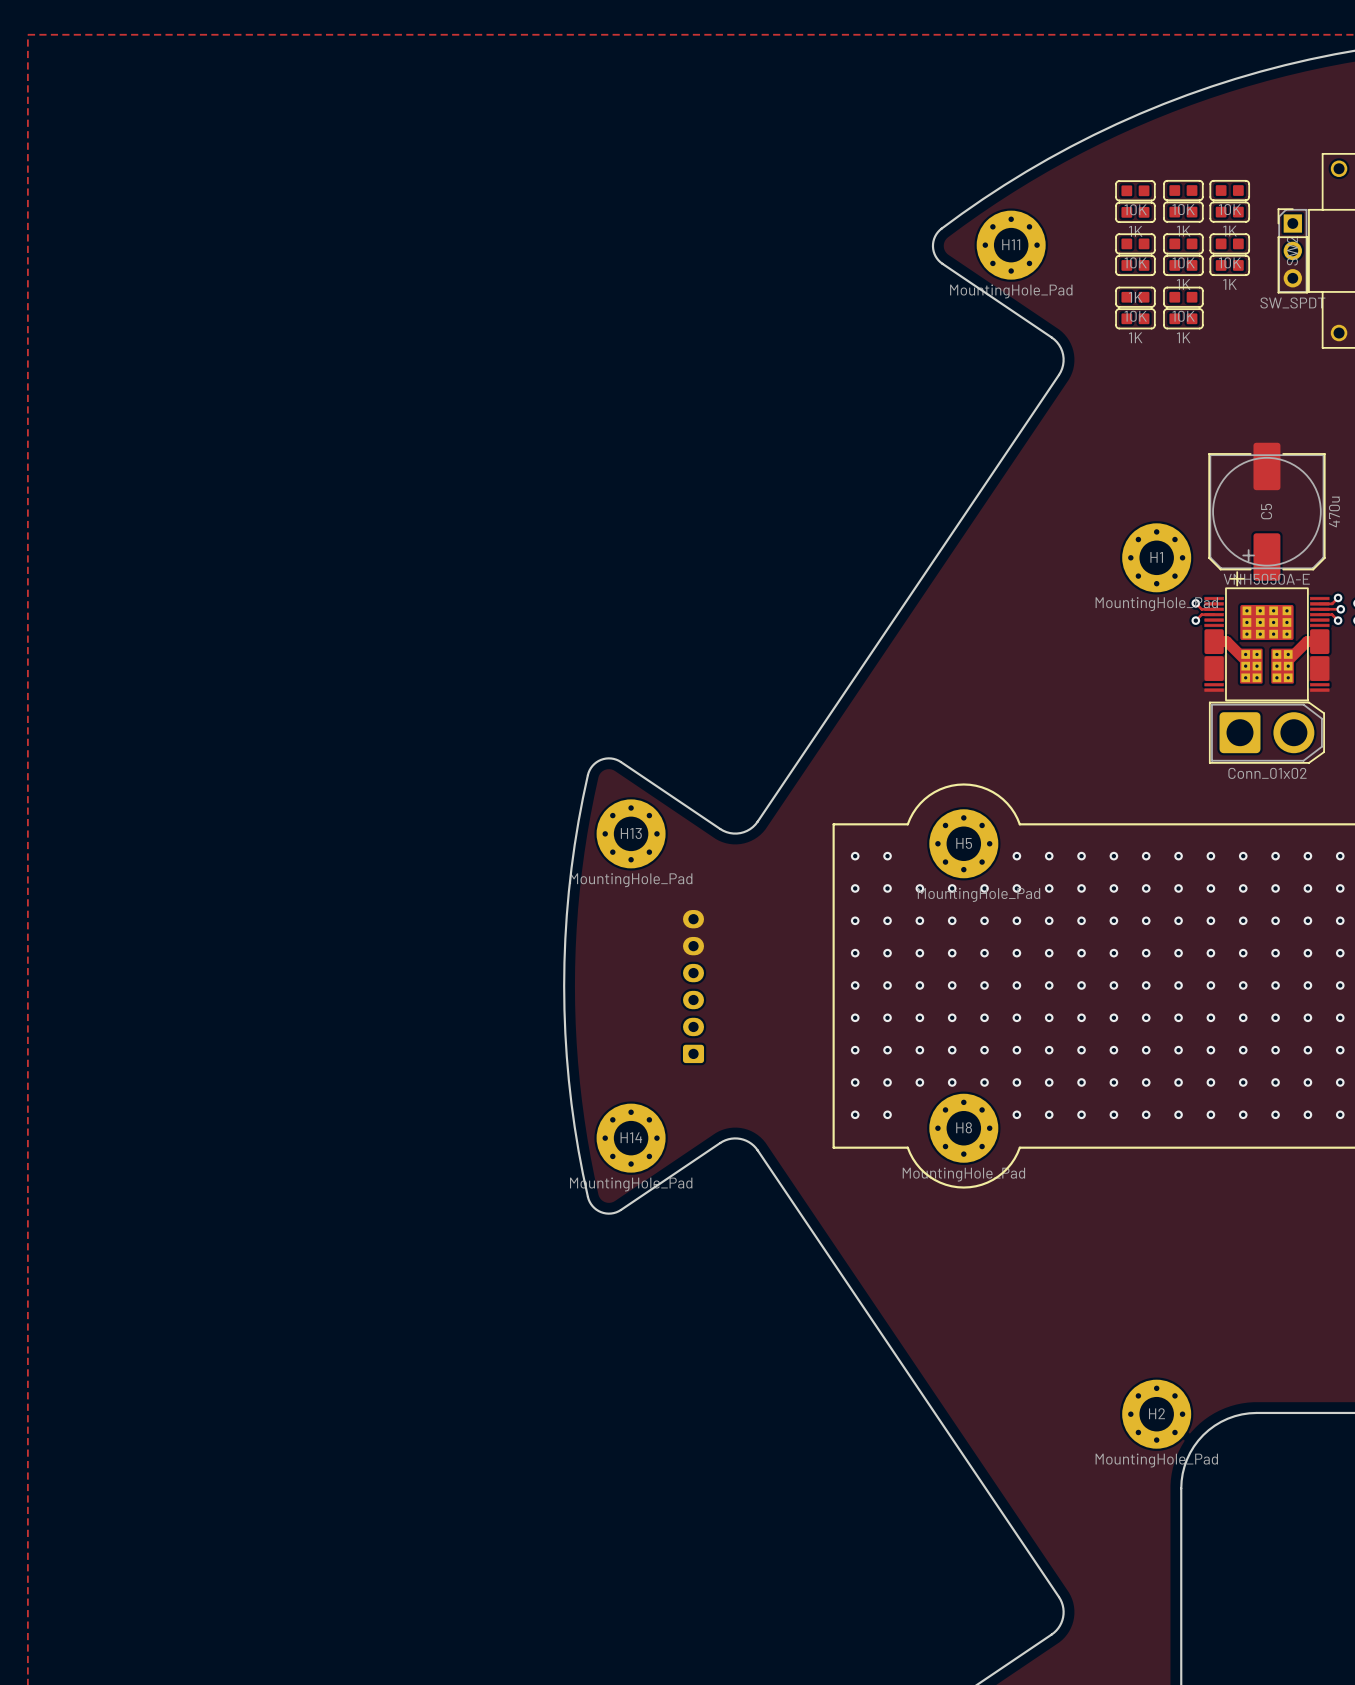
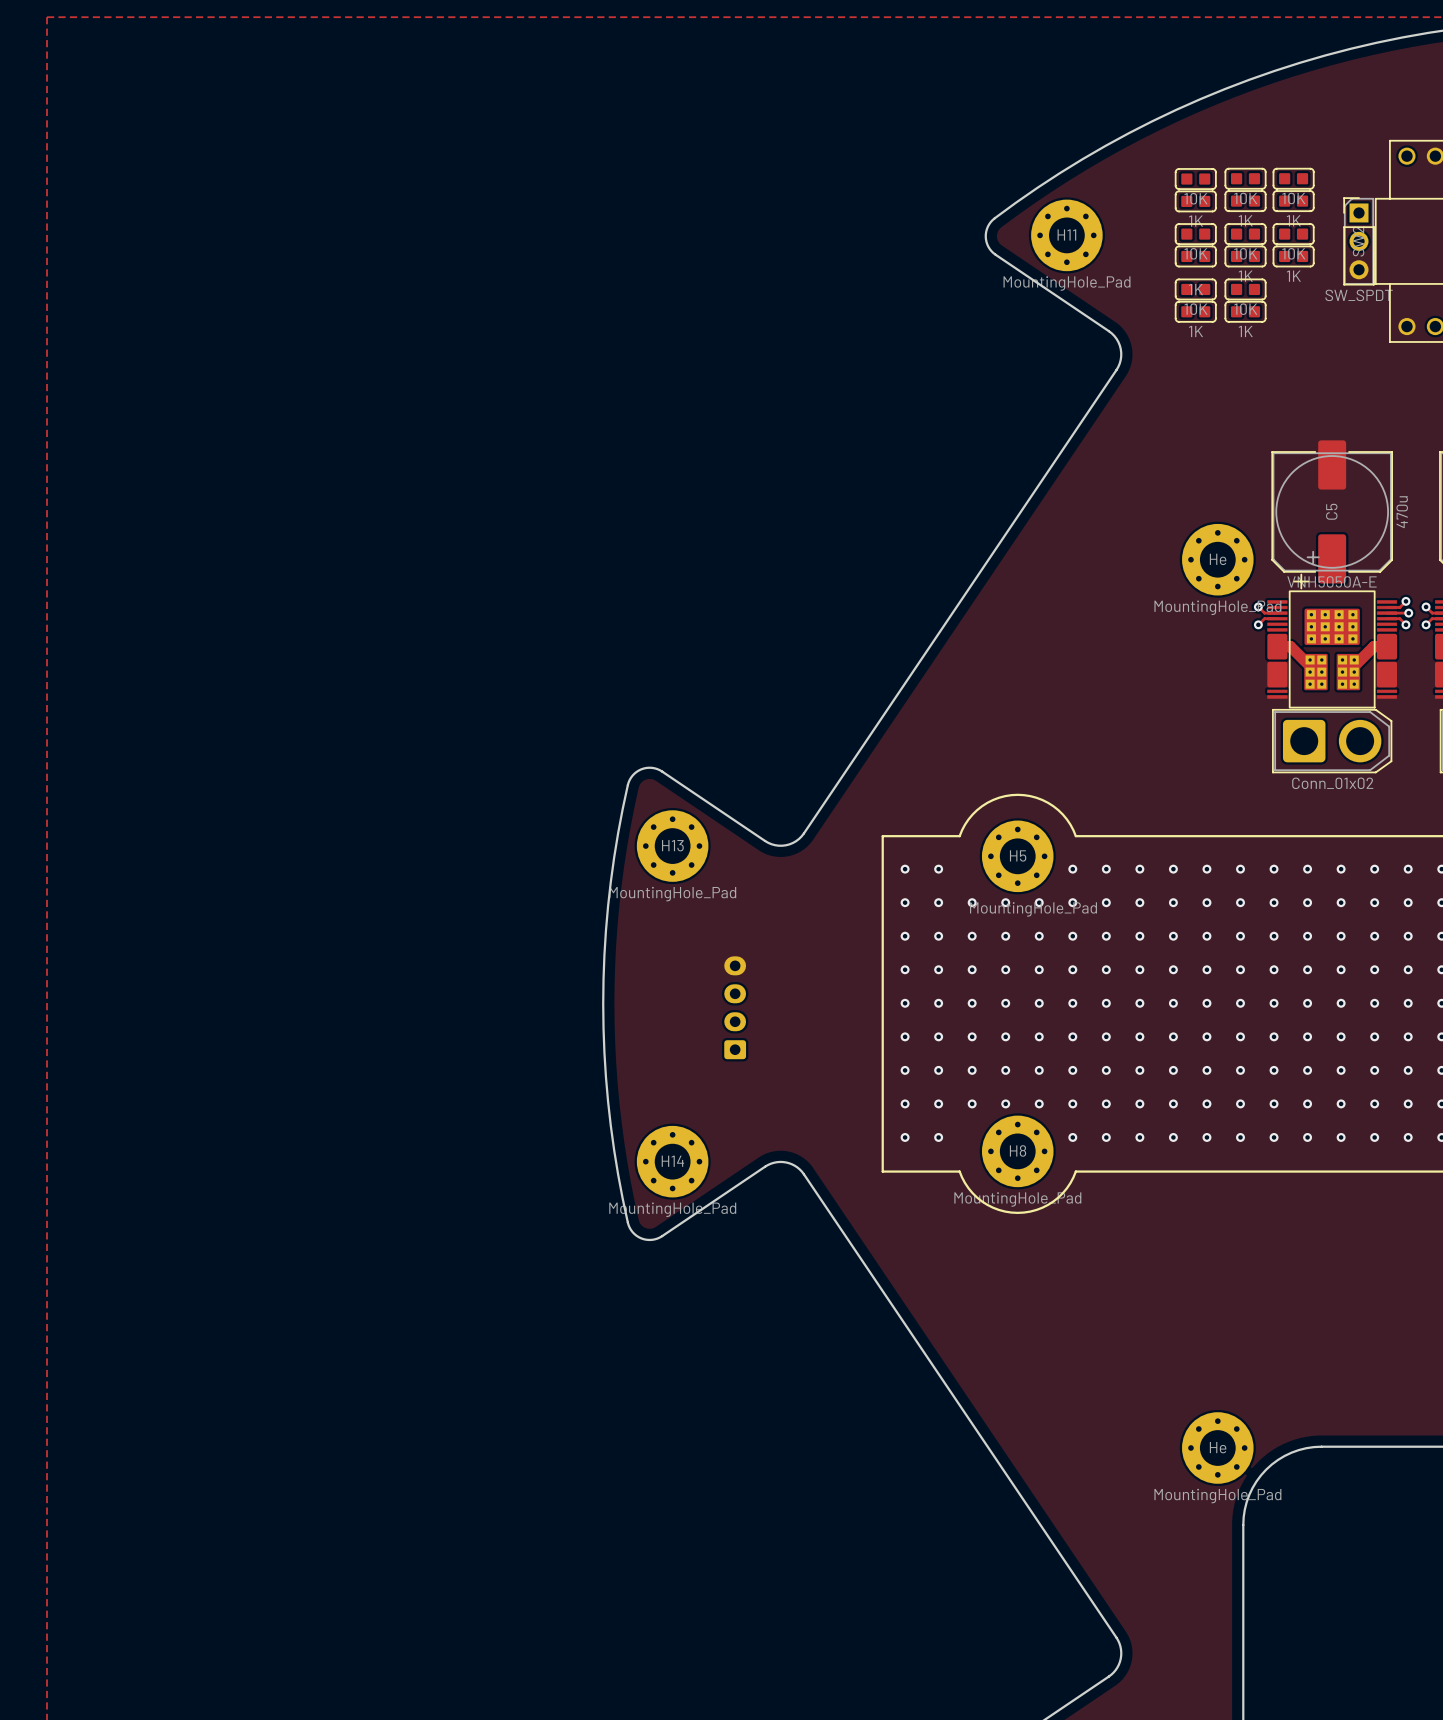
H1 name: H1 (1156, 557) -> He (1218, 559)
part footprint: [683, 910, 705, 1064] -> [724, 956, 747, 1060]
H2 name: H2 (1156, 1413) -> He (1218, 1447)

